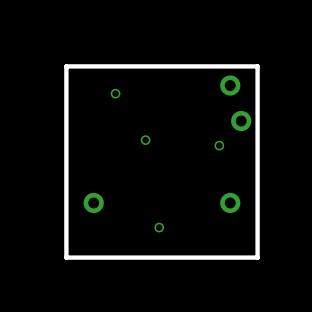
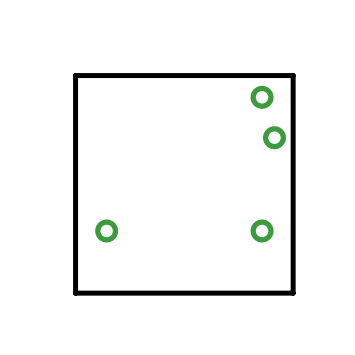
via: (115, 93) -> none
via: (145, 140) -> none
via: (219, 145) -> none
via: (159, 227) -> none

